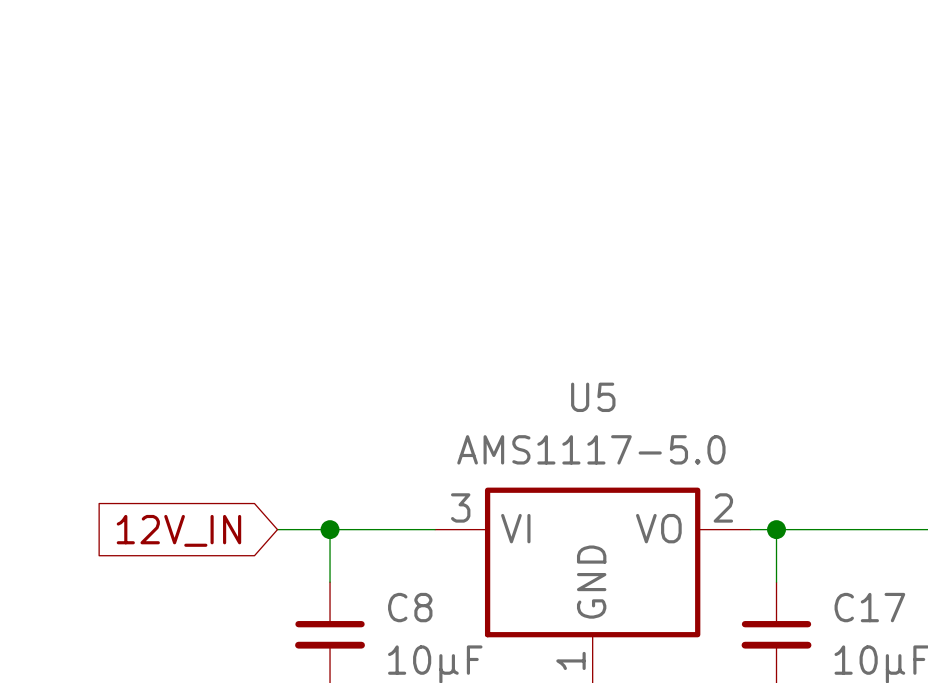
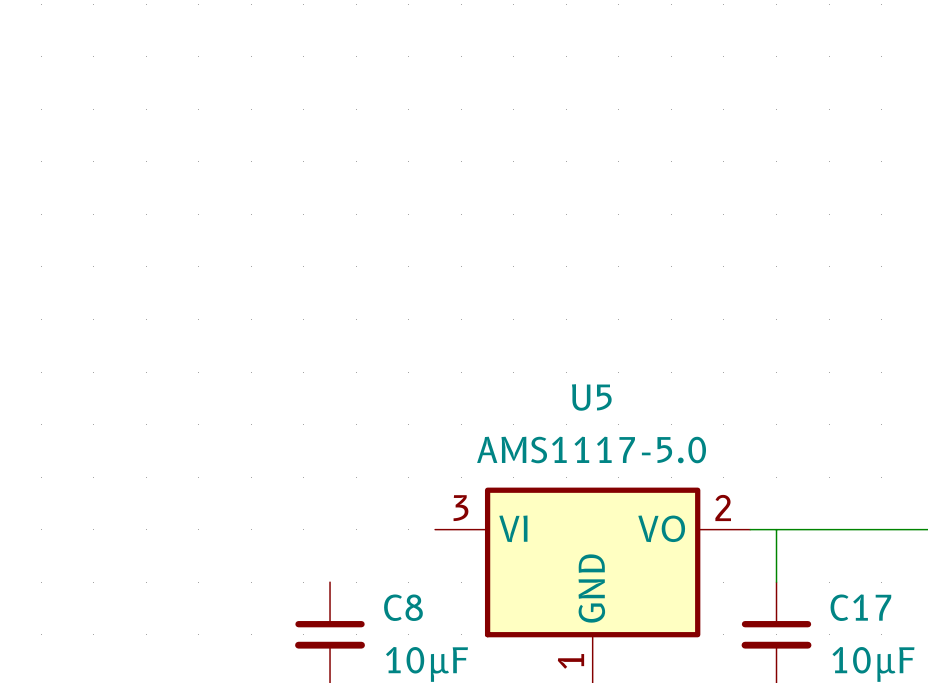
wire: (277, 529) (435, 529) -> none
wire: (330, 529) (330, 582) -> none
junction: (330, 529) -> none
junction: (776, 529) -> none
global label: 12V_IN (178, 530) -> none

